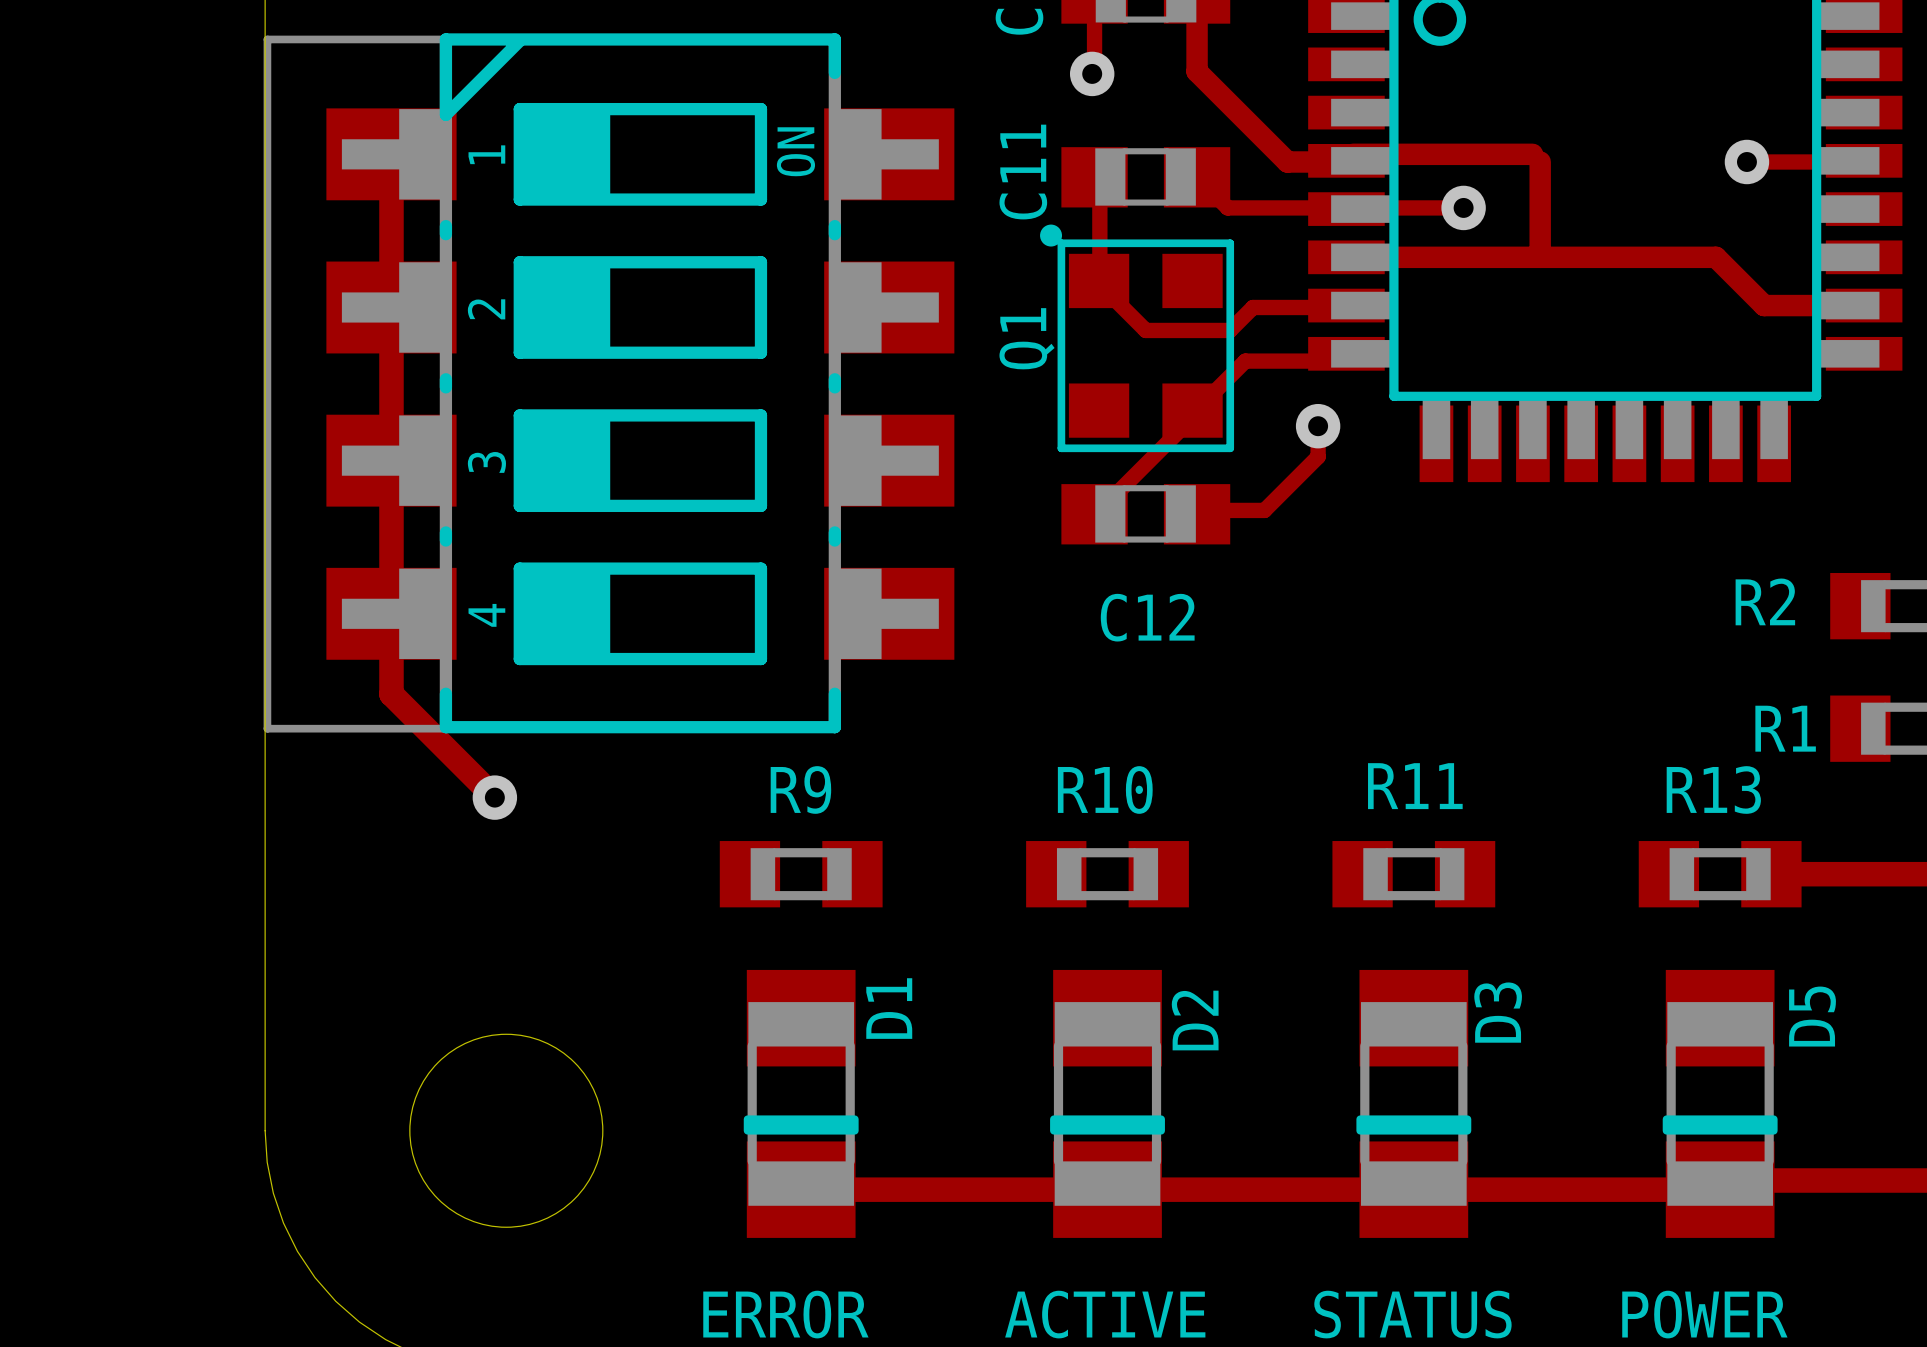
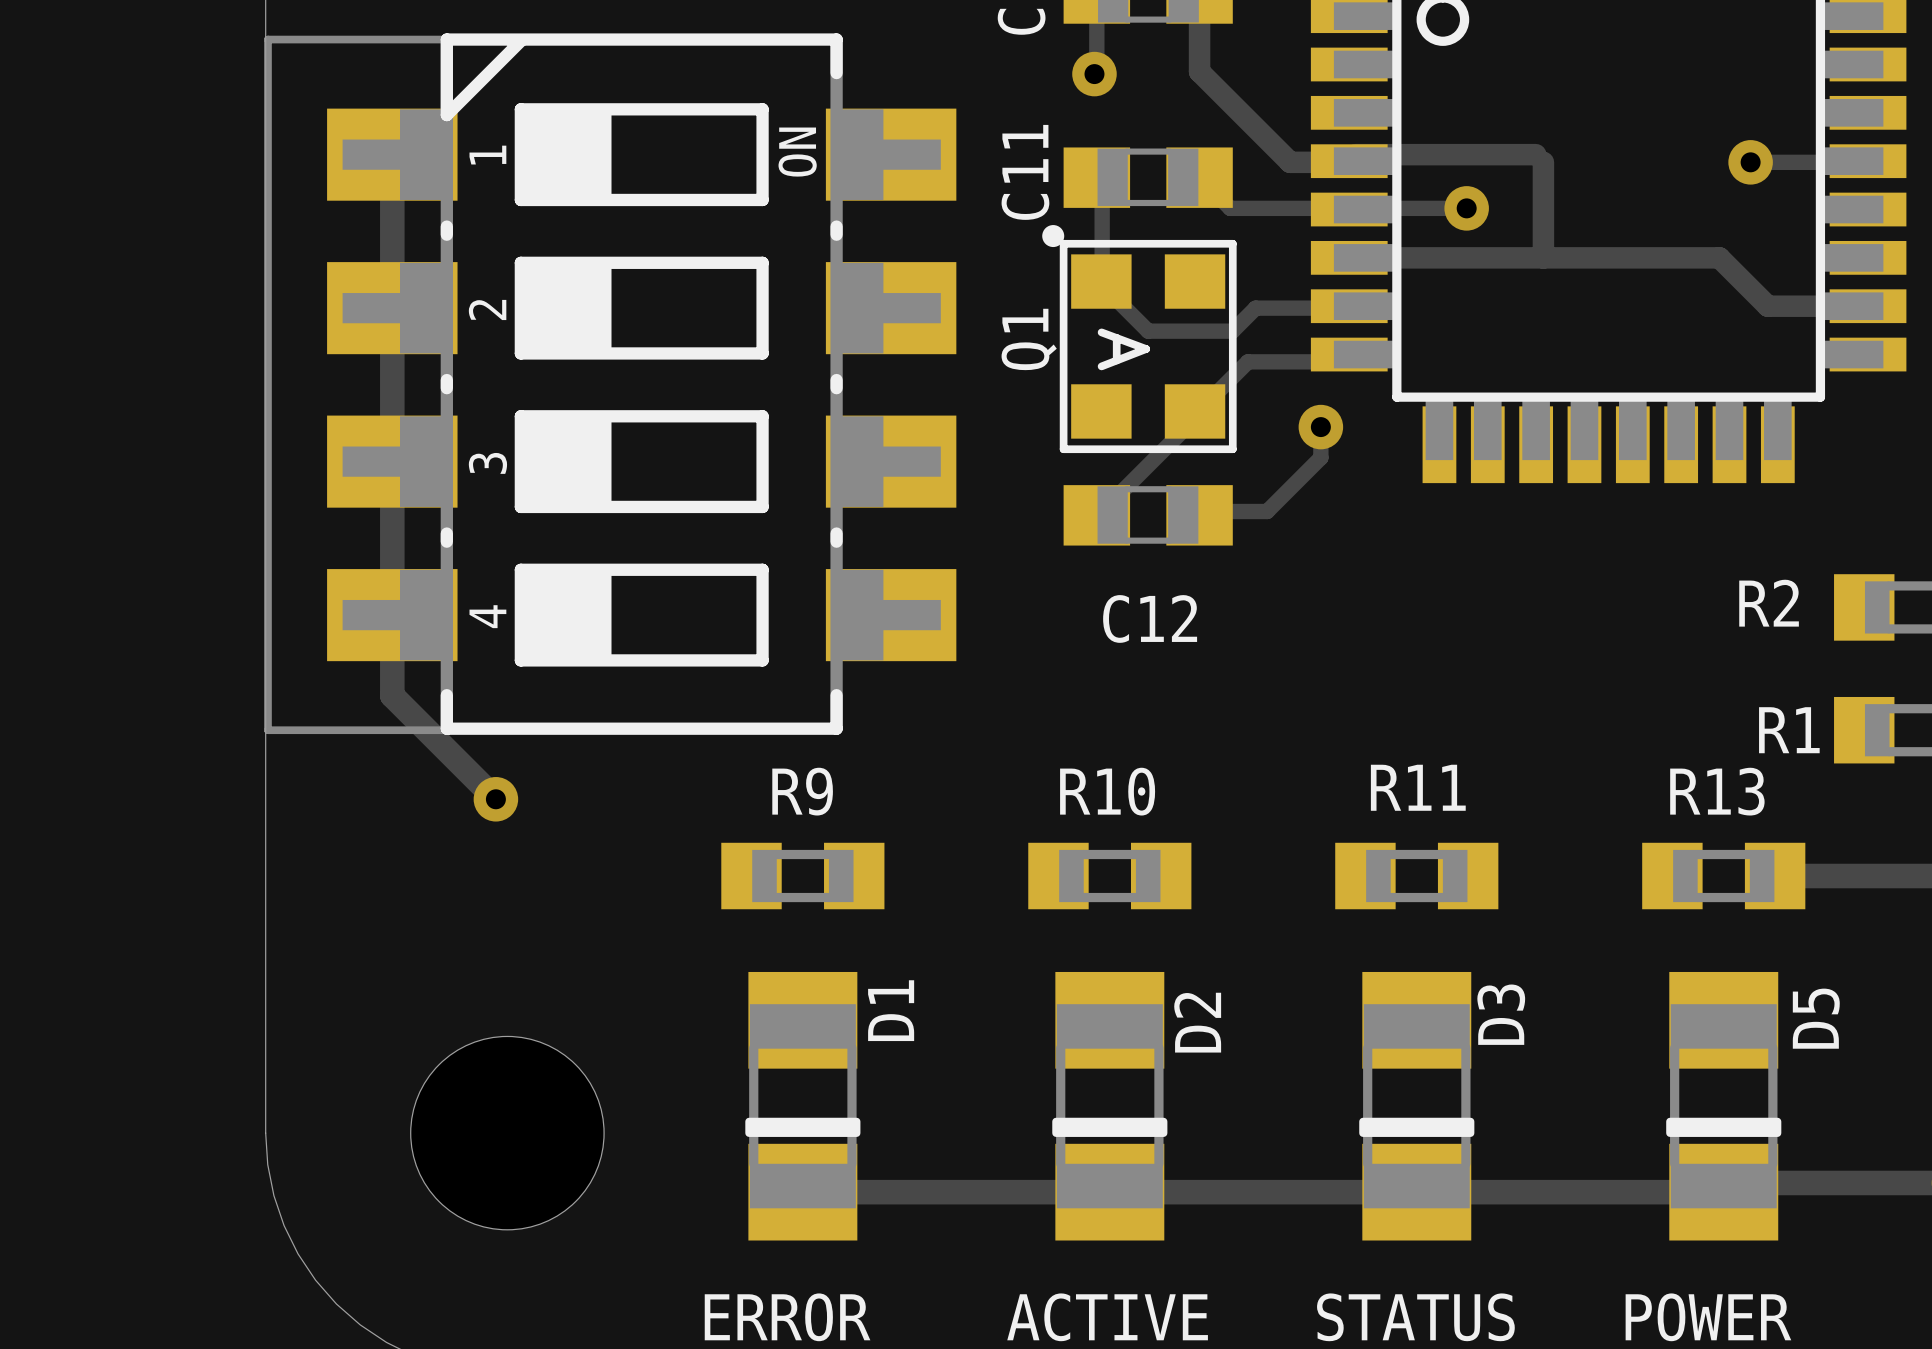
Q1 footprint: [1040, 224, 1235, 453] -> [1042, 225, 1237, 454]

